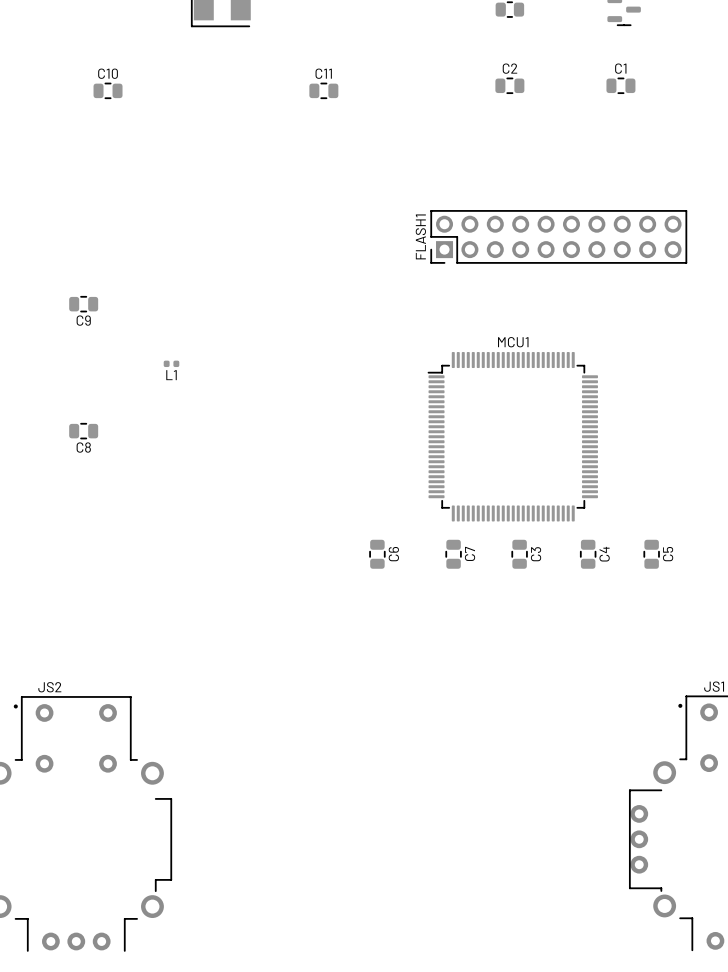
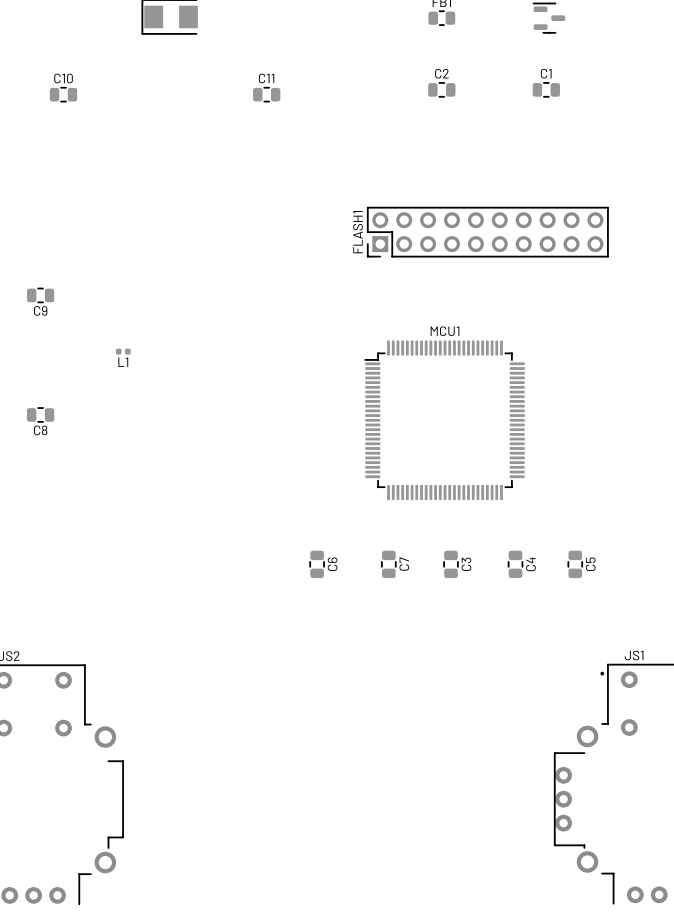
C6 position: (377, 554) -> (317, 564)
C7 position: (453, 554) -> (388, 564)
C3 position: (519, 554) -> (450, 564)
C4 position: (588, 554) -> (515, 564)
C5 position: (651, 554) -> (575, 564)

